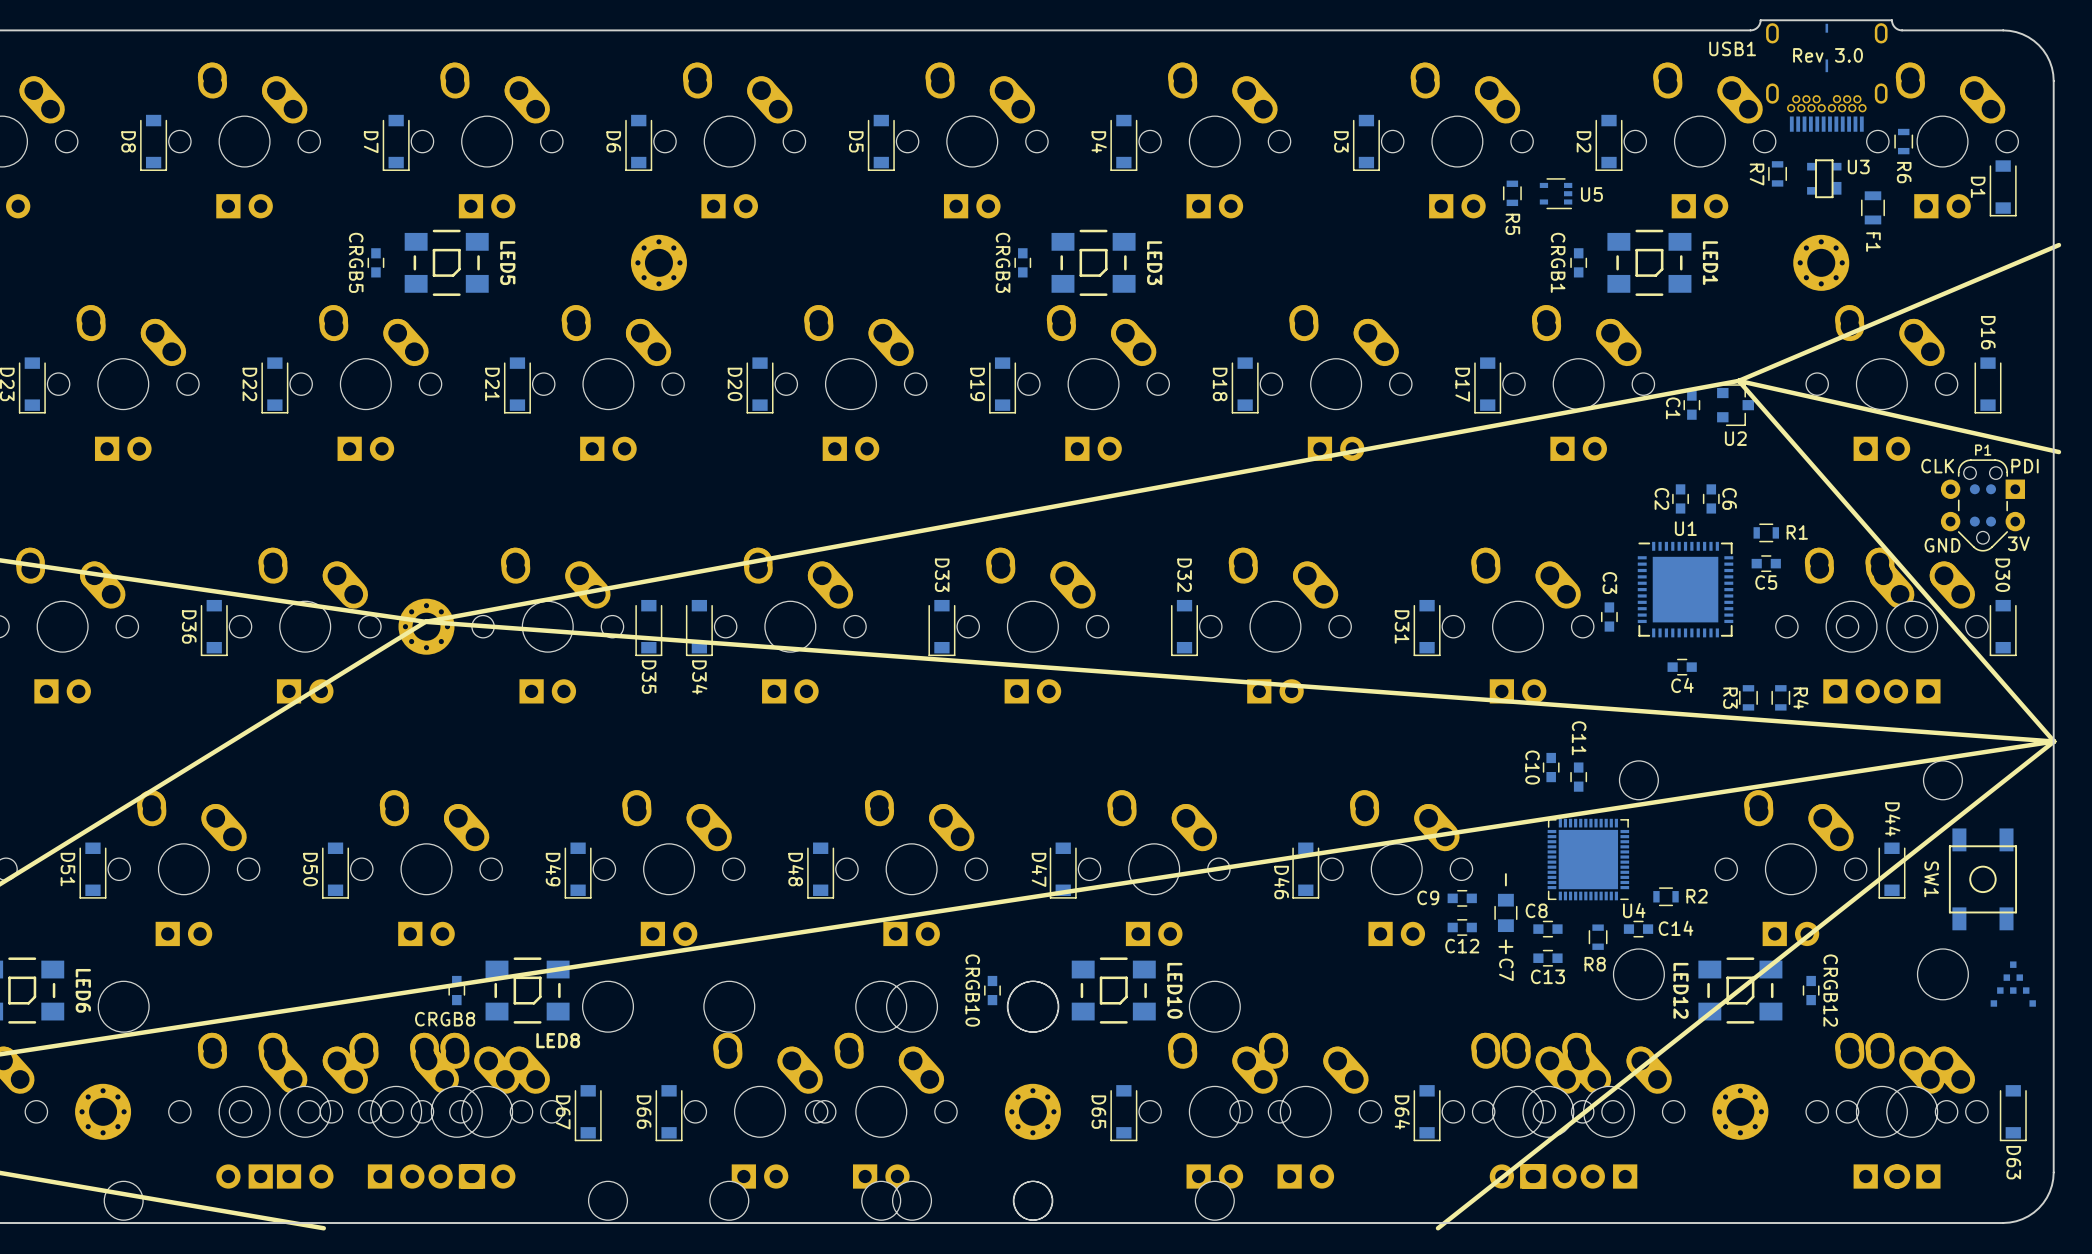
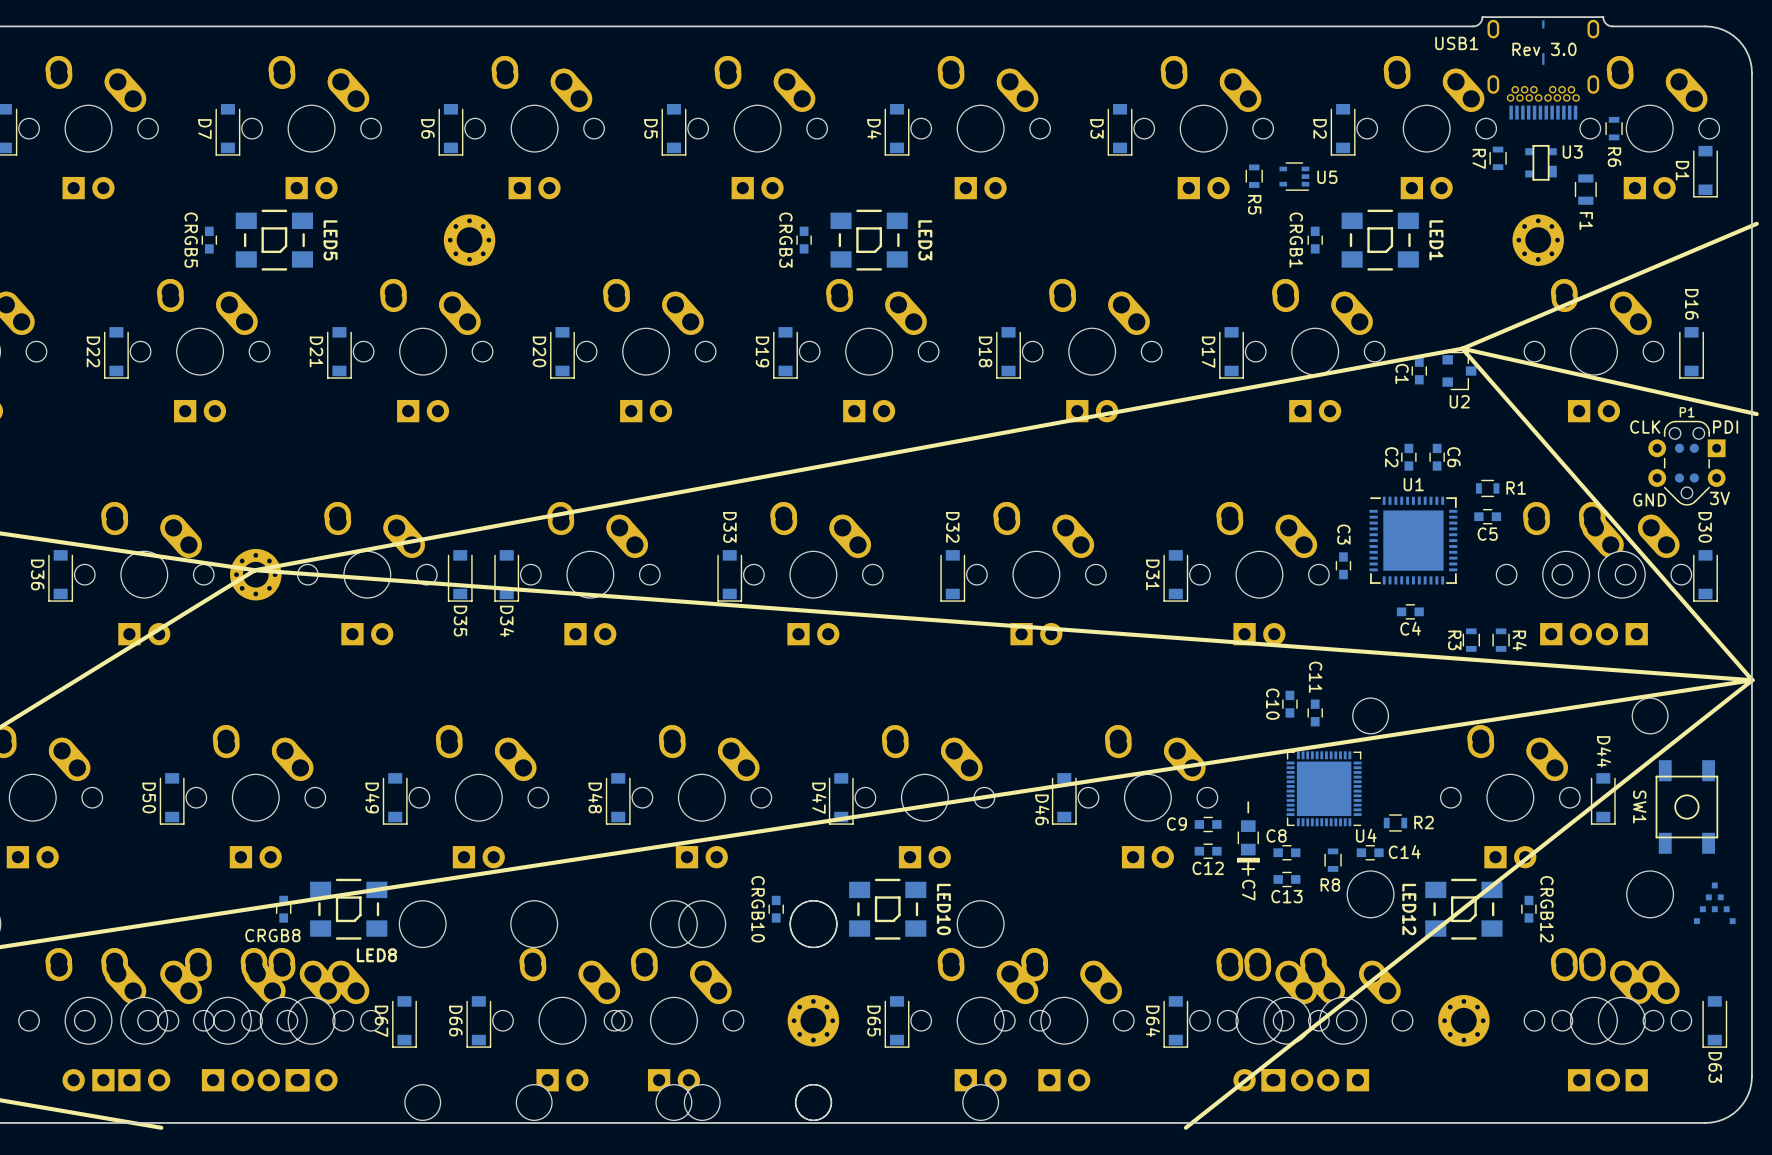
line: none -> (1258, 858) (1258, 861) (1237, 861) (1237, 858) (1258, 858)
line: none -> (1258, 860) (1237, 860)

